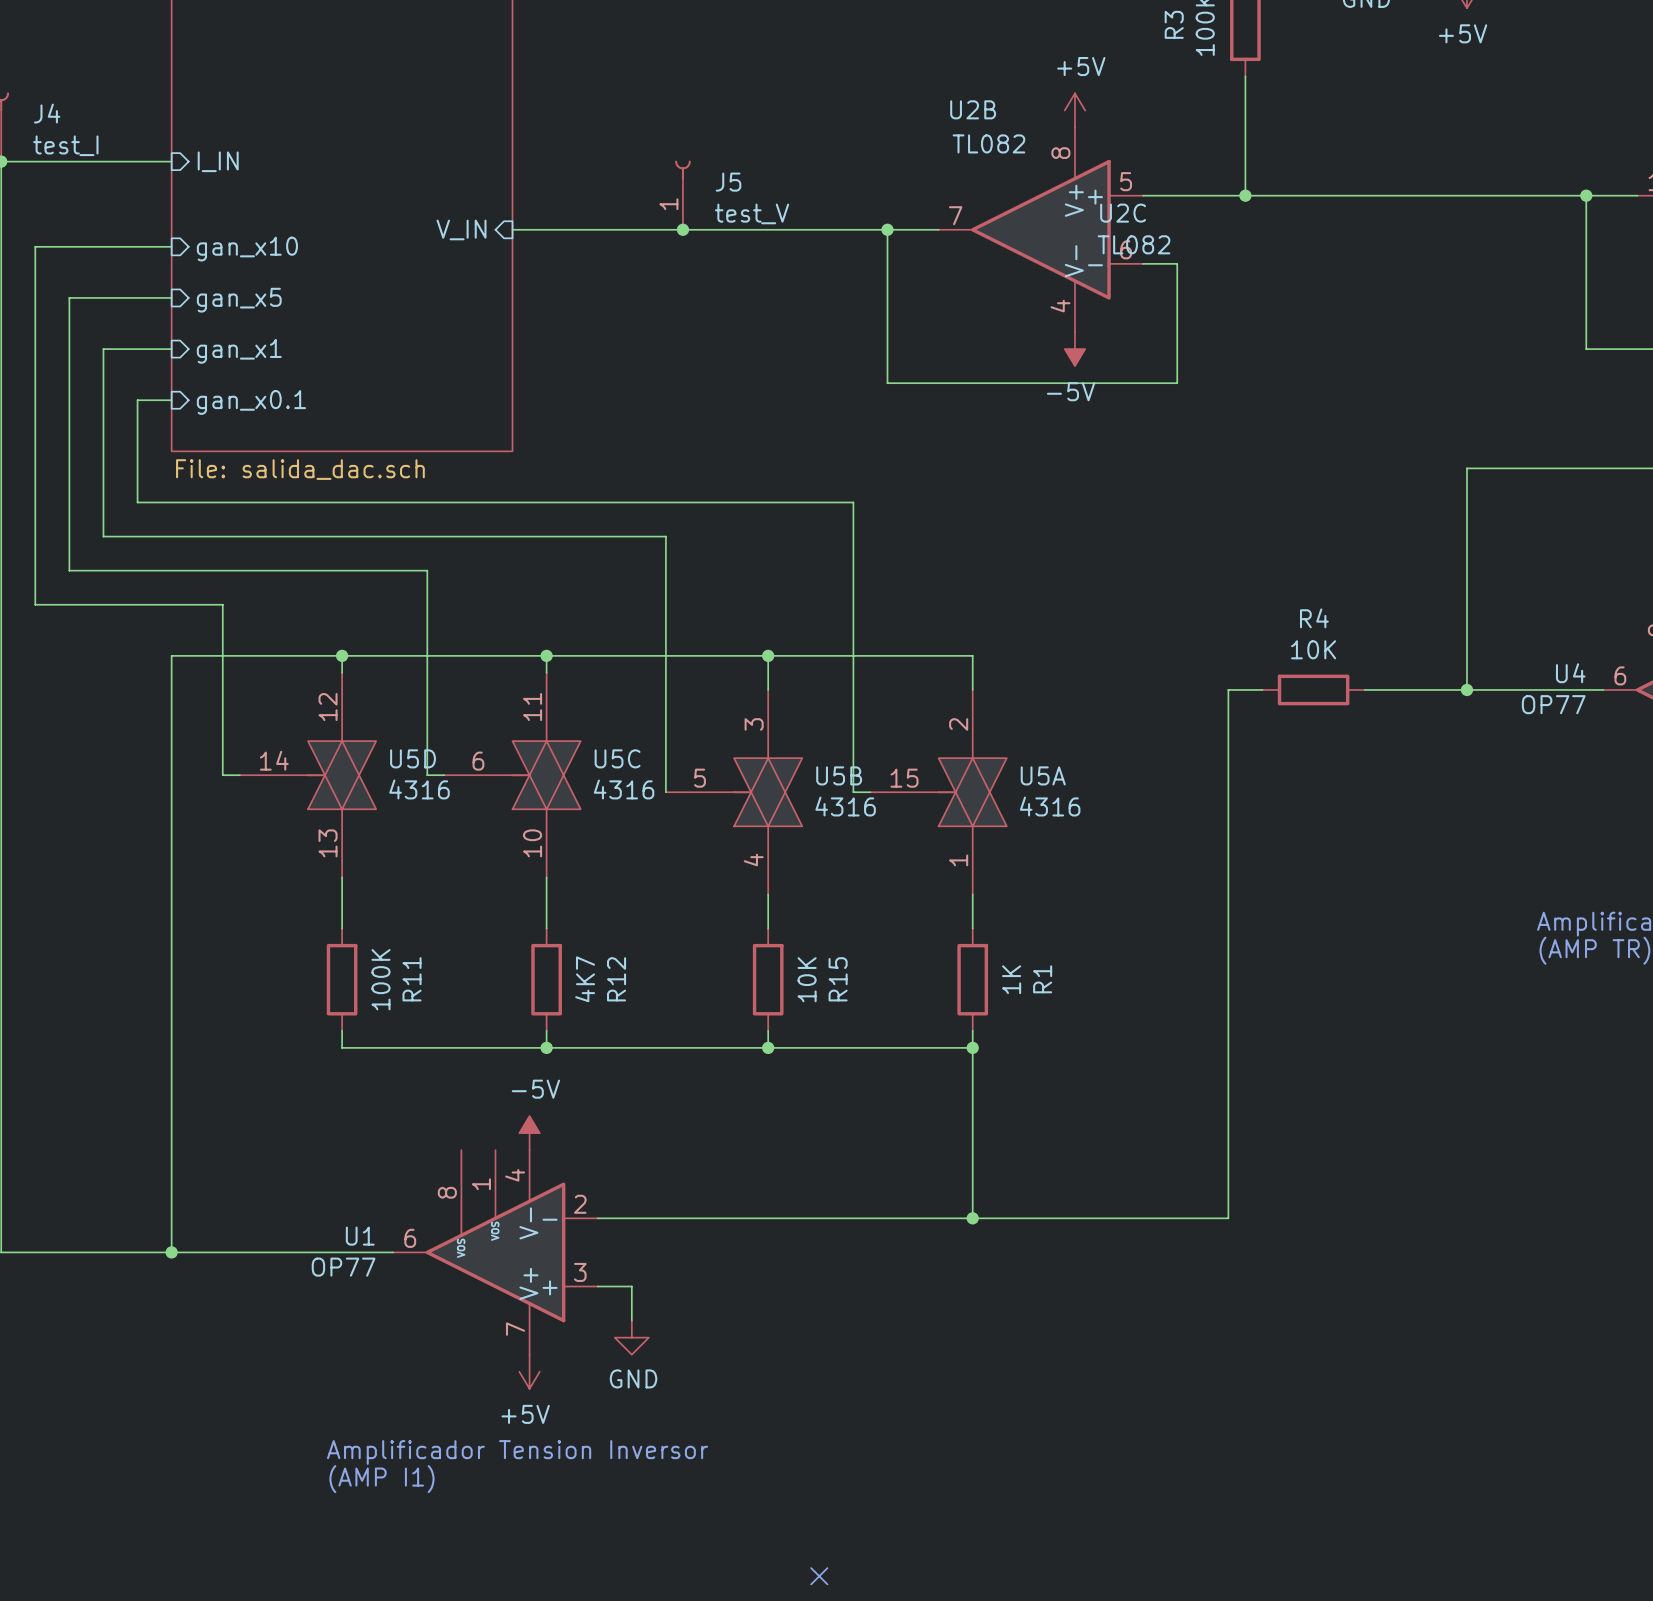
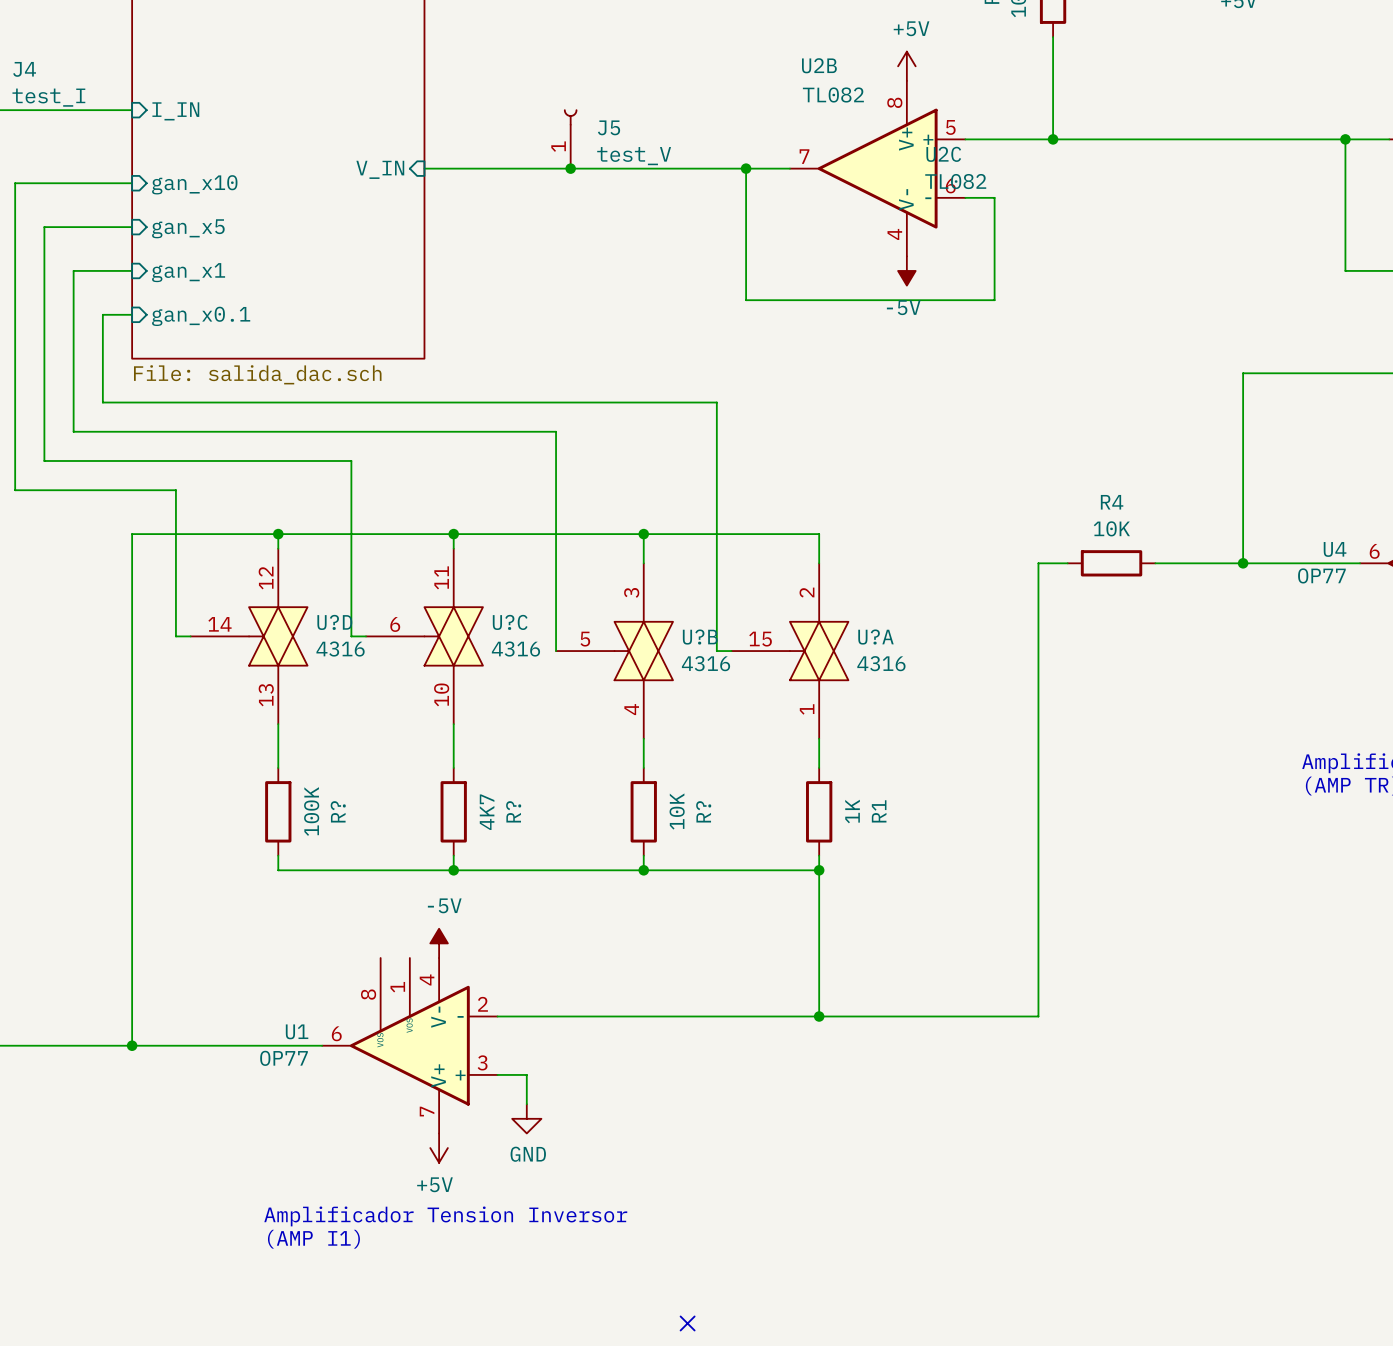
U5D name: U5D (413, 758) -> U?D (334, 622)
U5C name: U5C (617, 758) -> U?C (510, 622)
U5B name: U5B (839, 775) -> U?B (700, 637)
U5A name: U5A (1043, 775) -> U?A (875, 637)
R11 name: R11 (412, 979) -> R? (338, 811)
R12 name: R12 (616, 979) -> R? (513, 811)
R15 name: R15 (838, 979) -> R? (703, 811)

